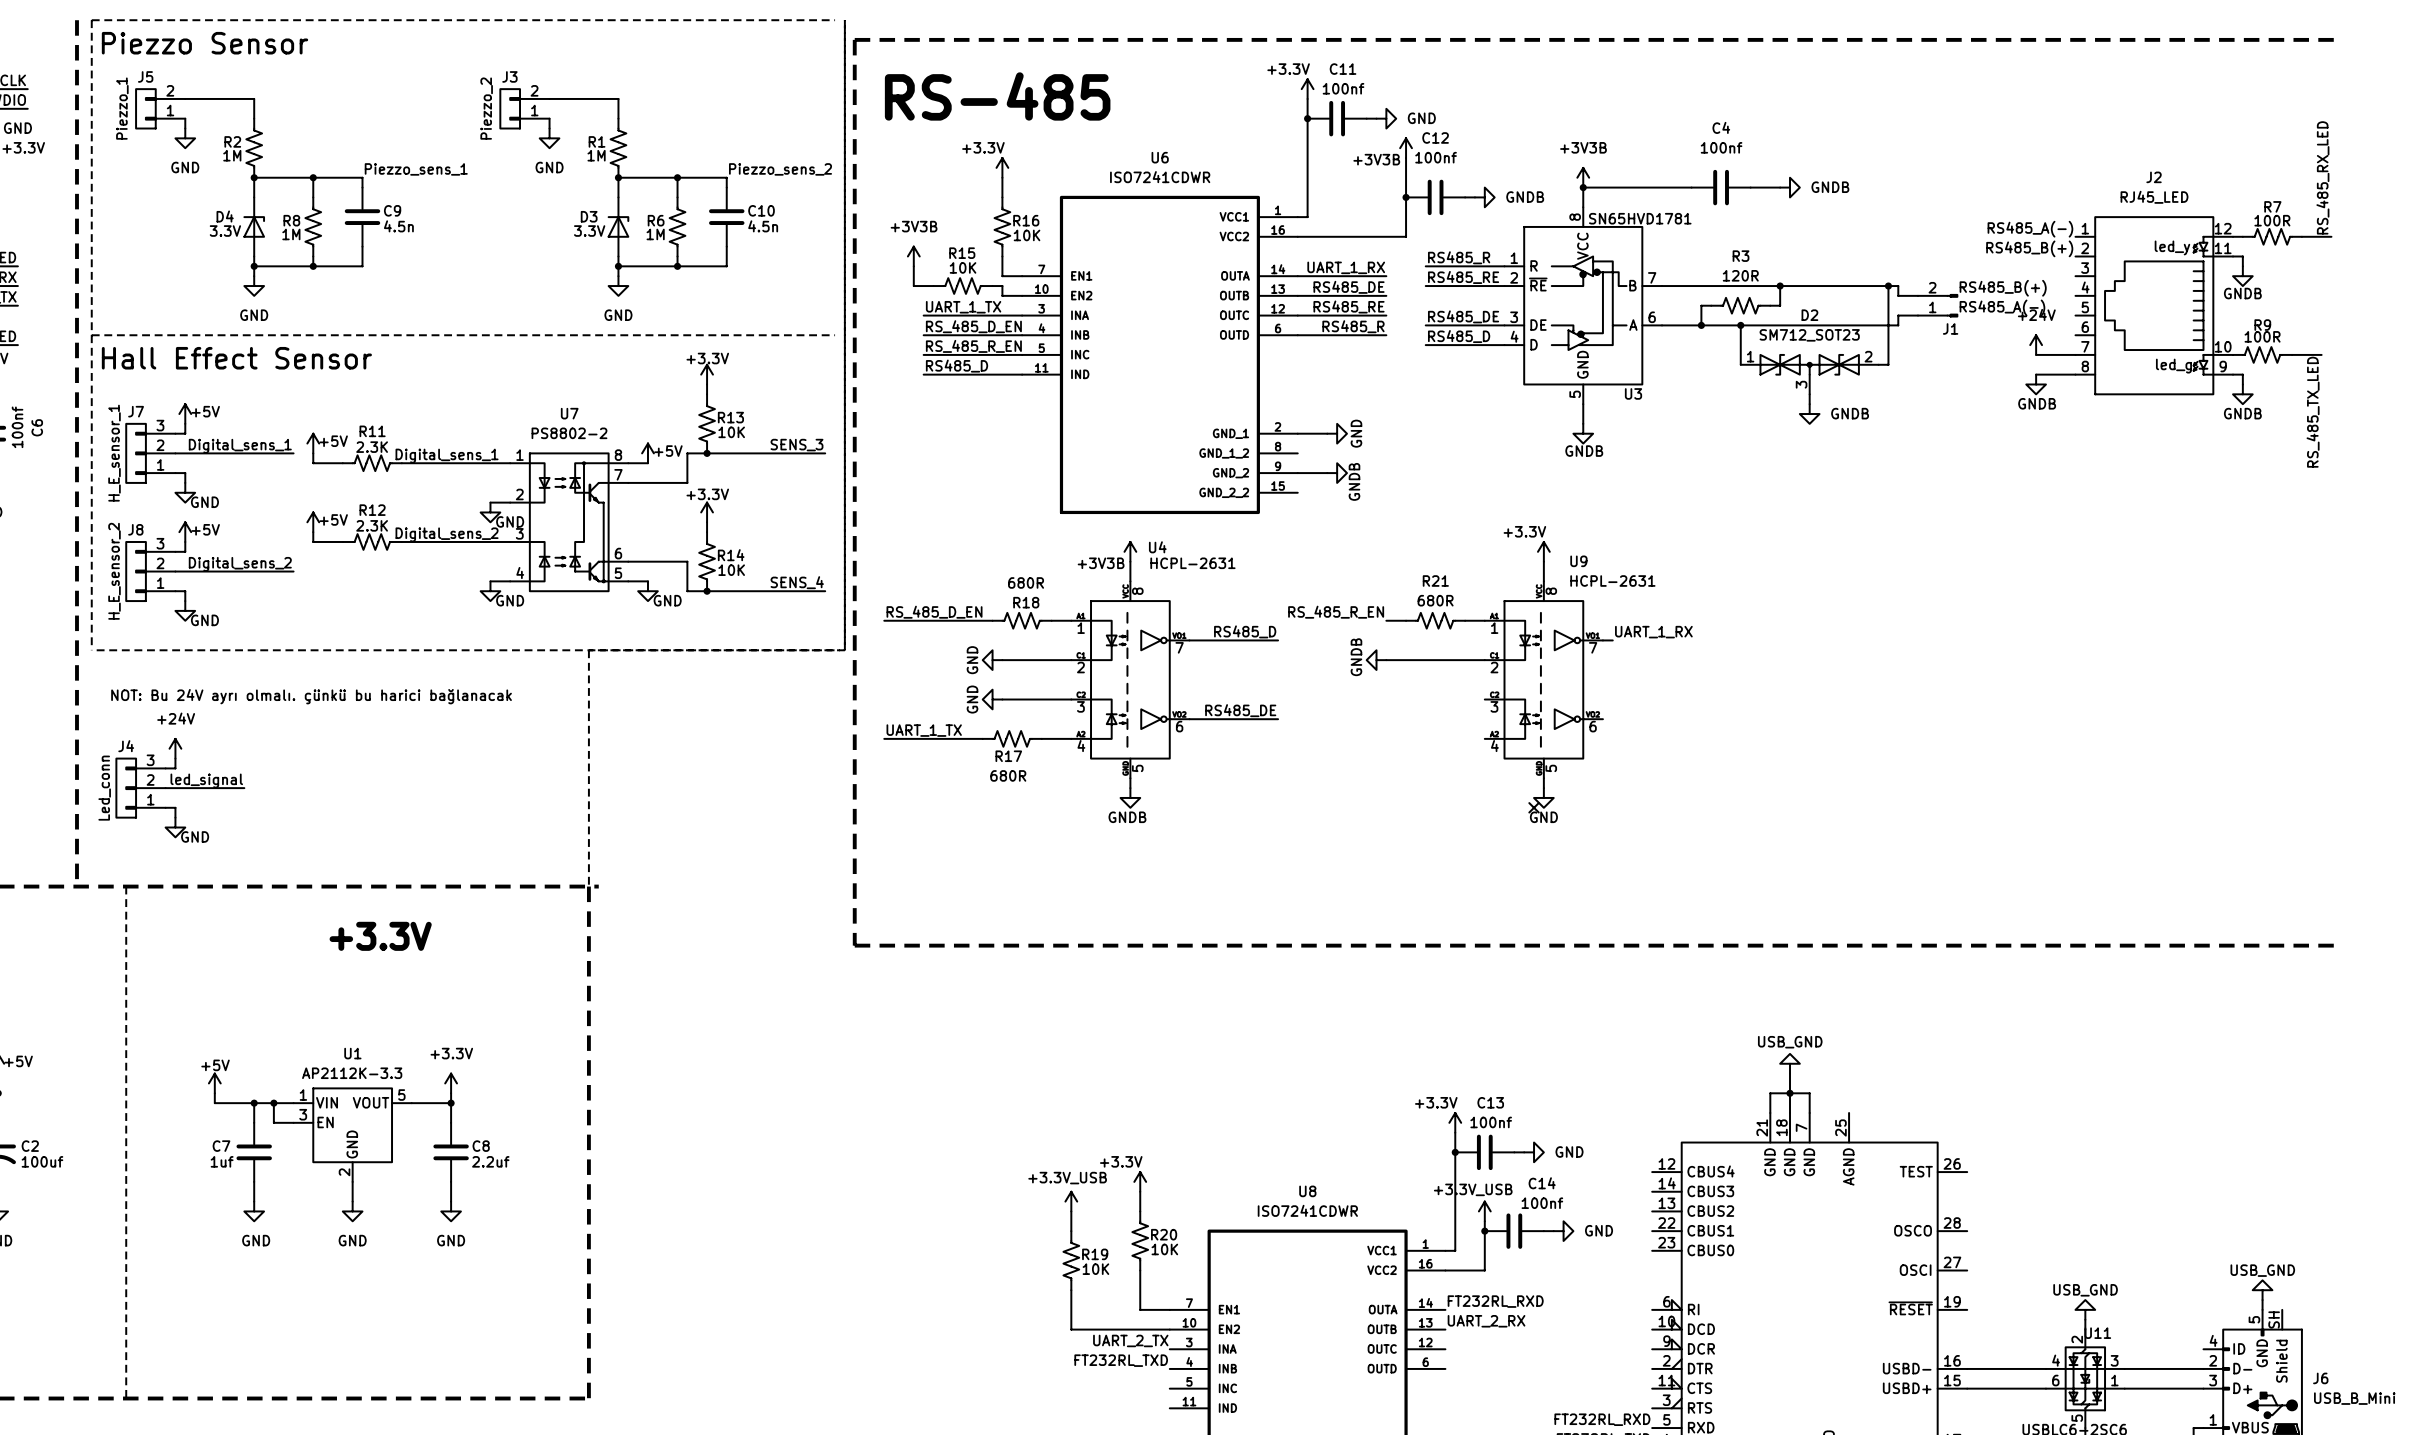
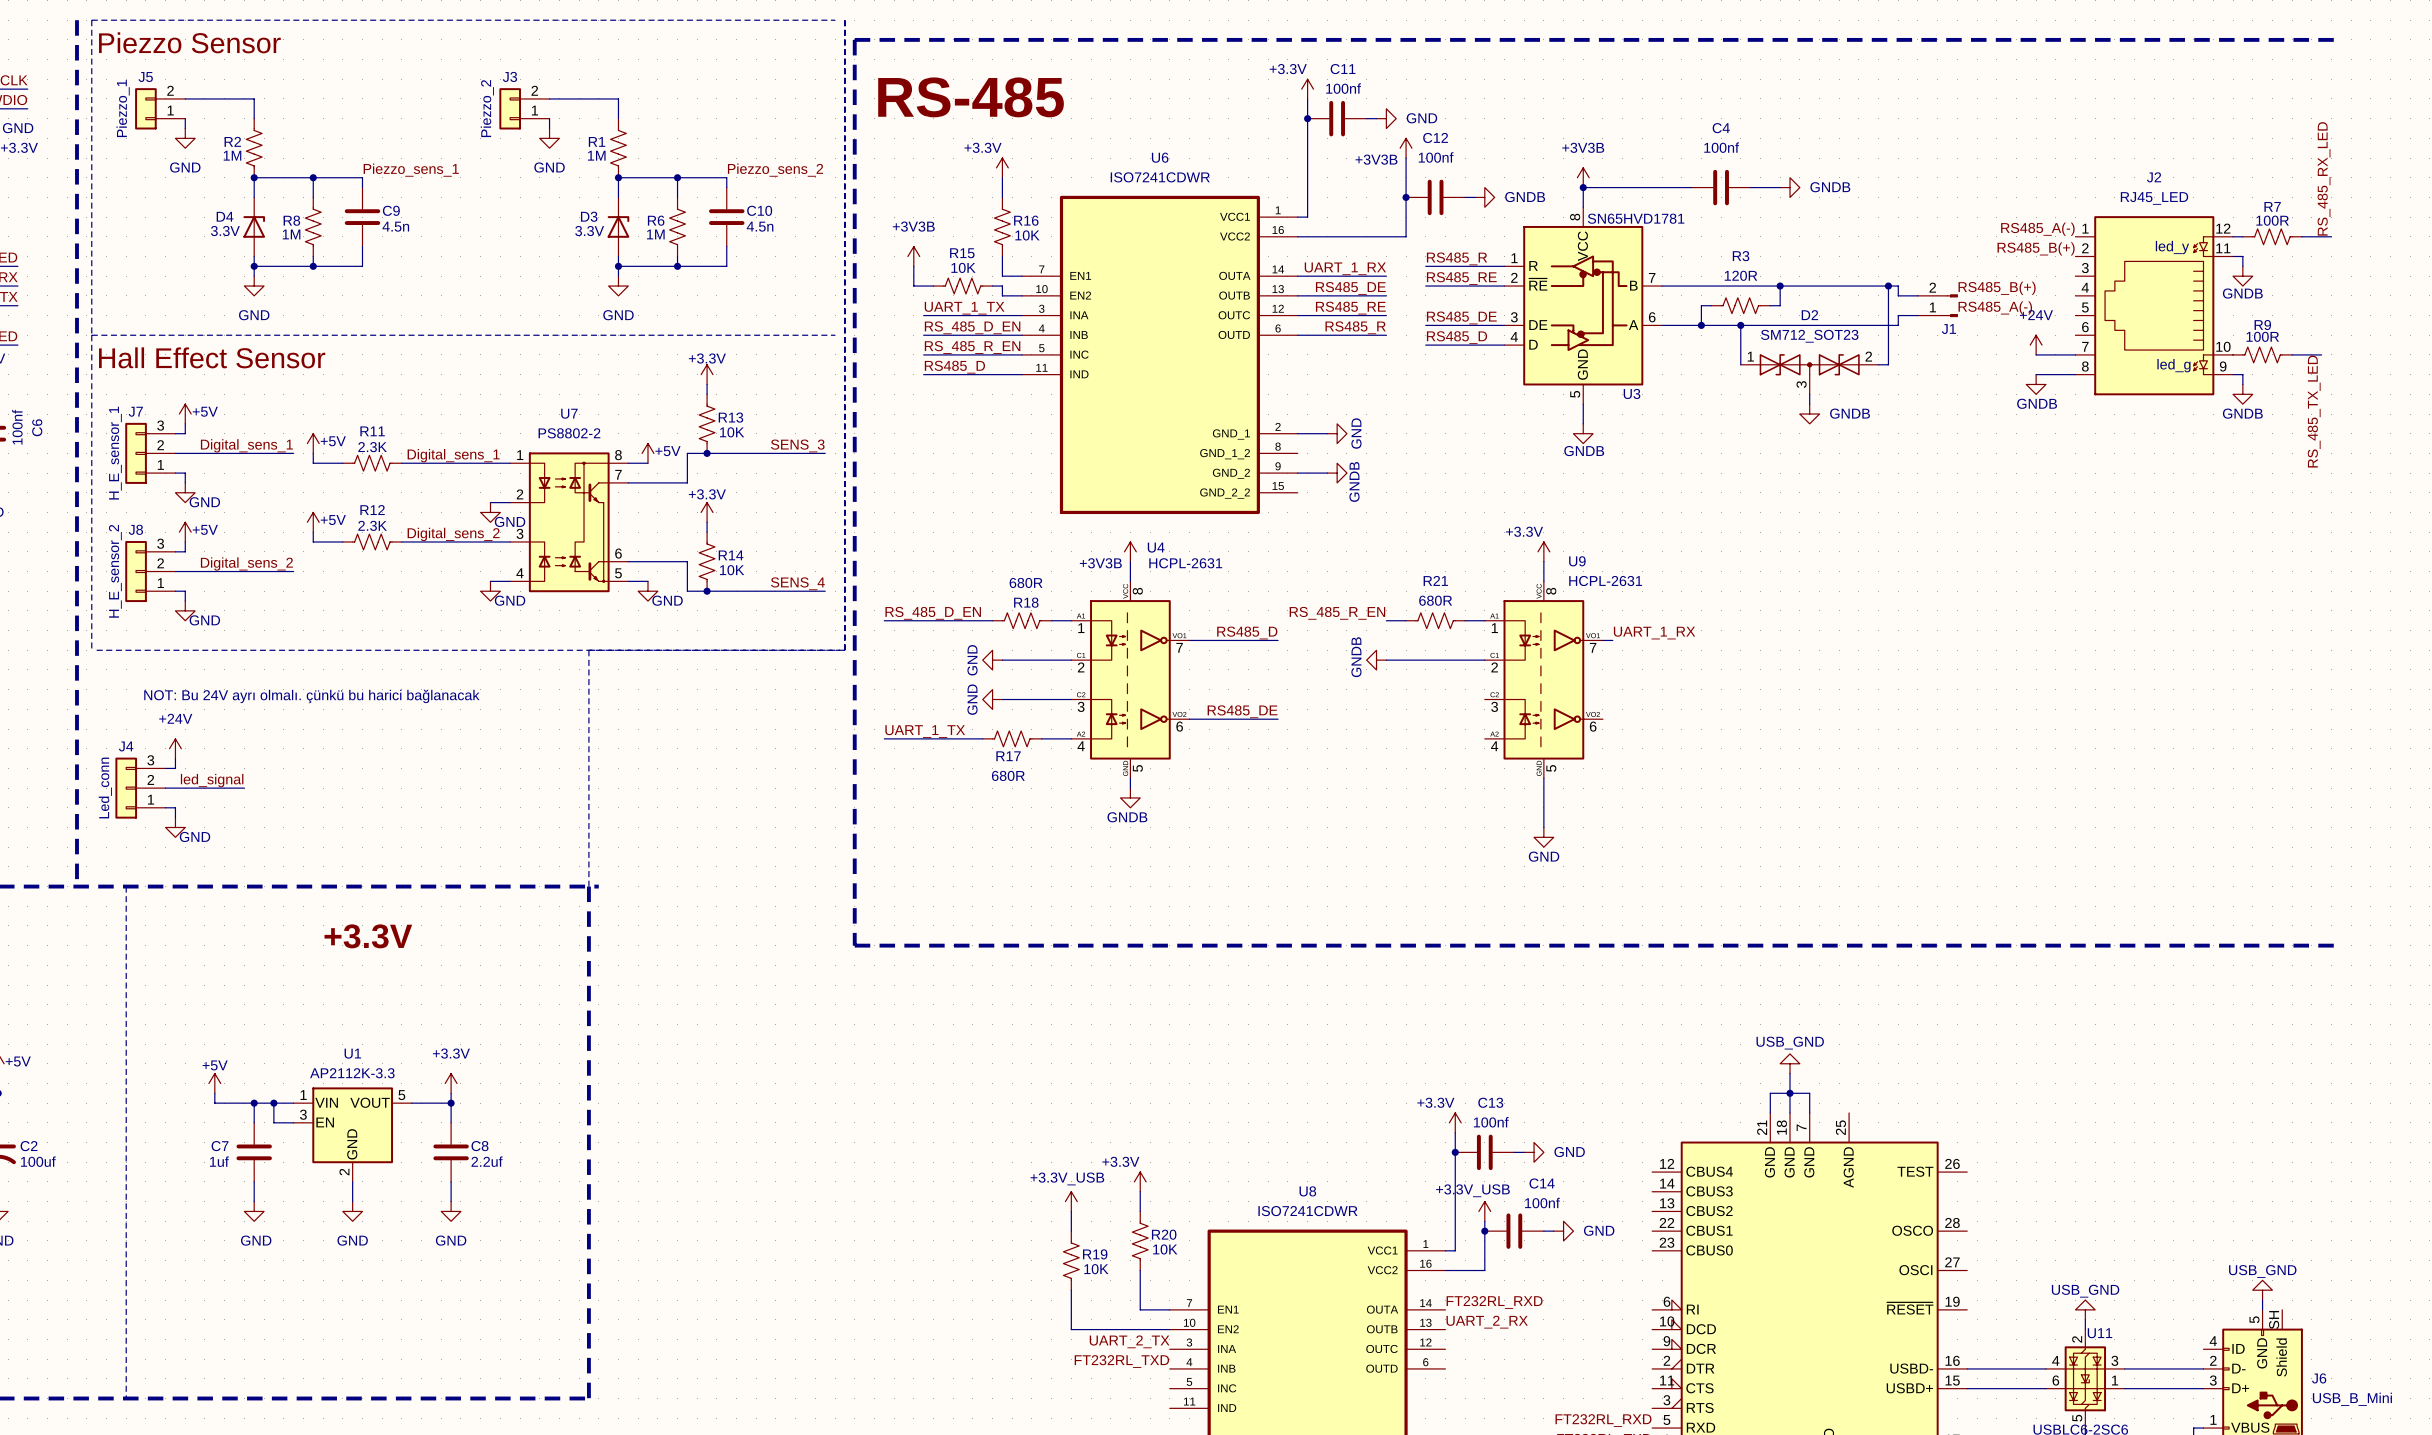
wire: none -> (1543, 788) (1543, 827)
power symbol position: GND (1543, 797) -> GND (1543, 837)
no-connect mark: (1534, 807) -> none

